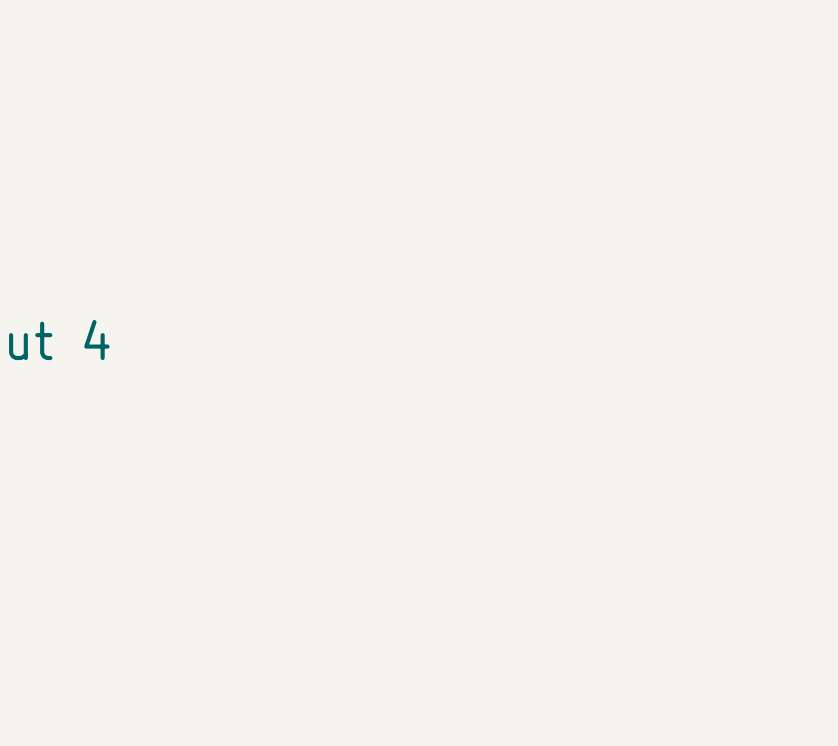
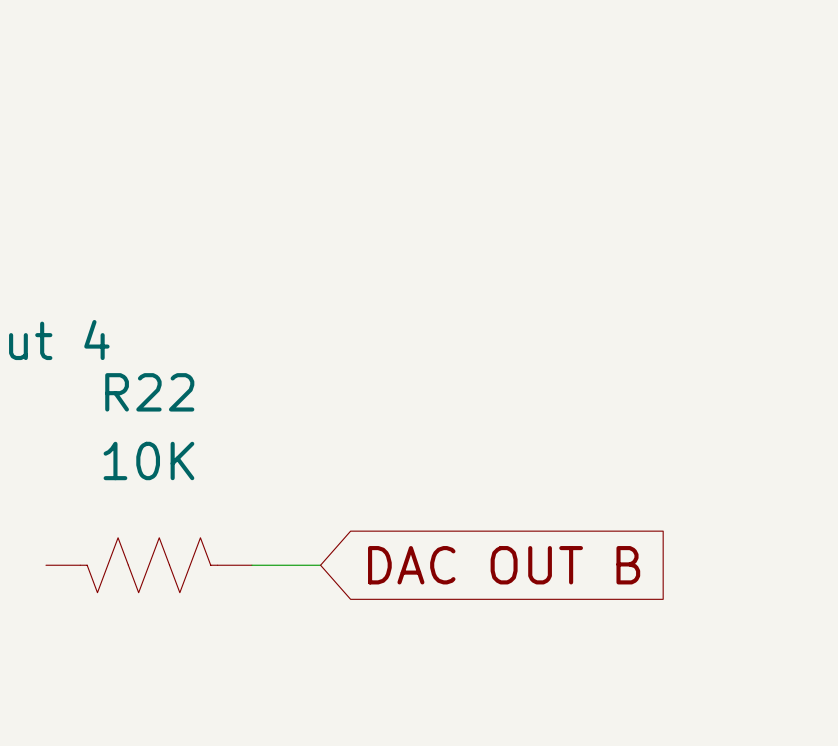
R22: none -> 10K (148, 565)
wire: none -> (251, 565) (320, 565)
global label: none -> DAC OUT B (504, 565)

